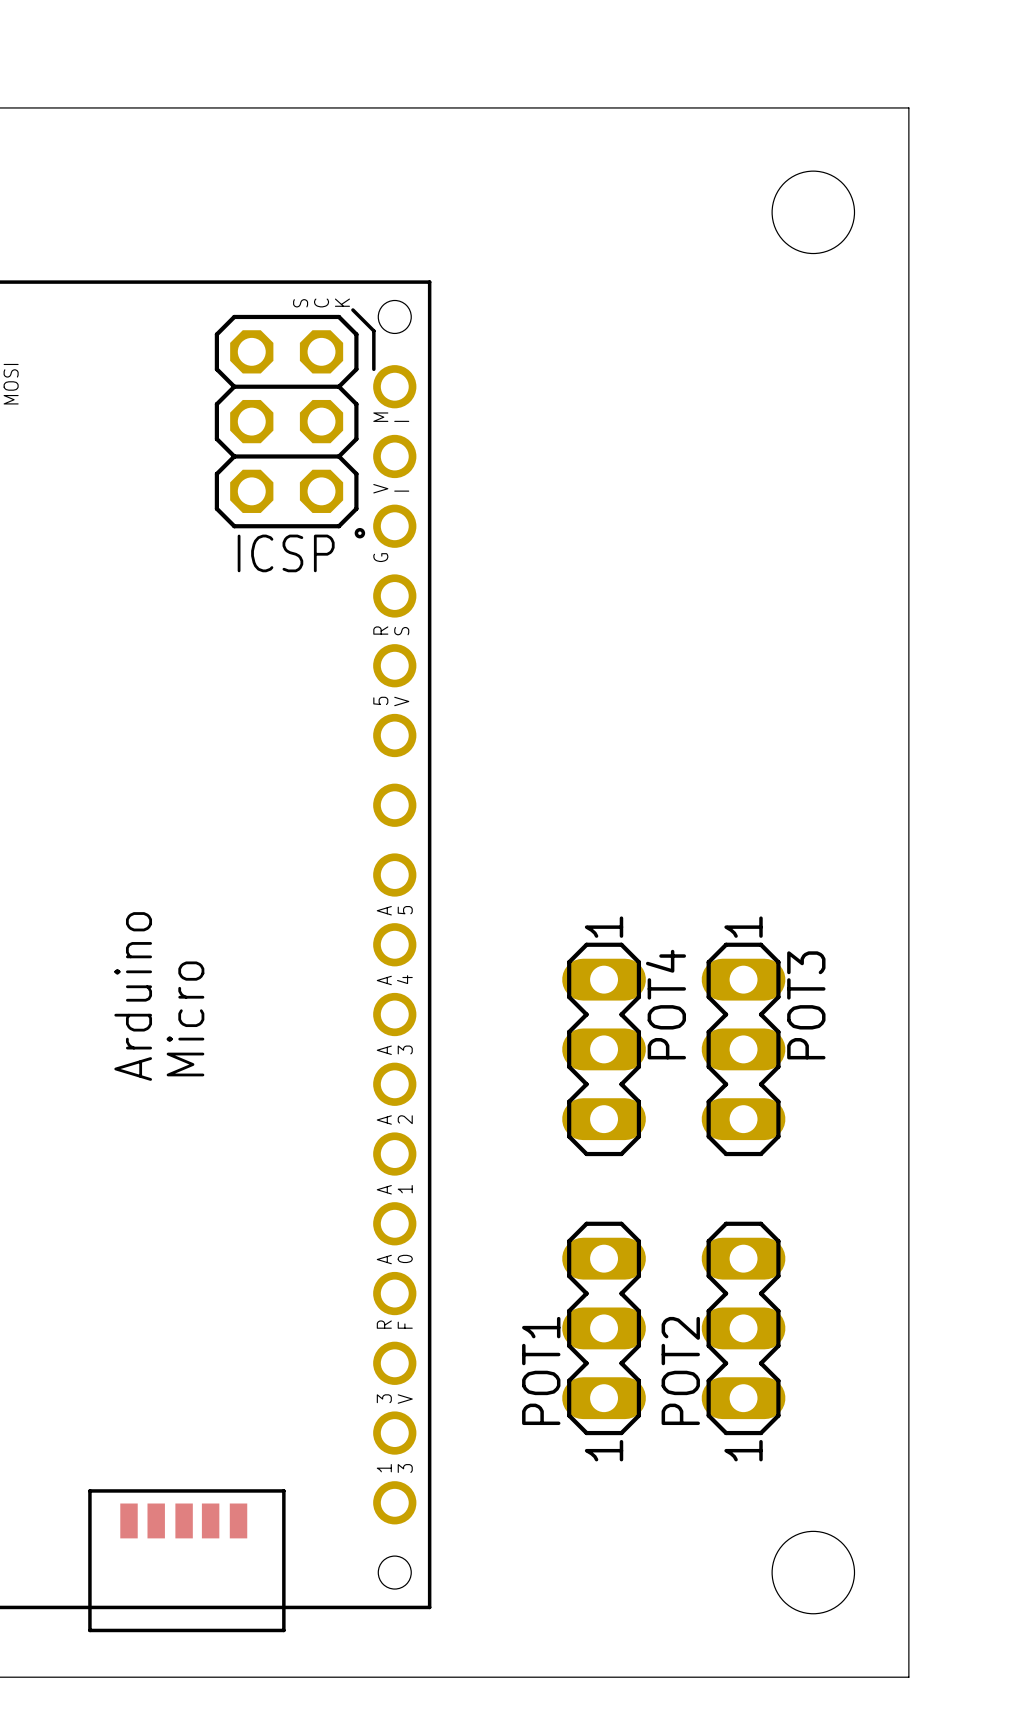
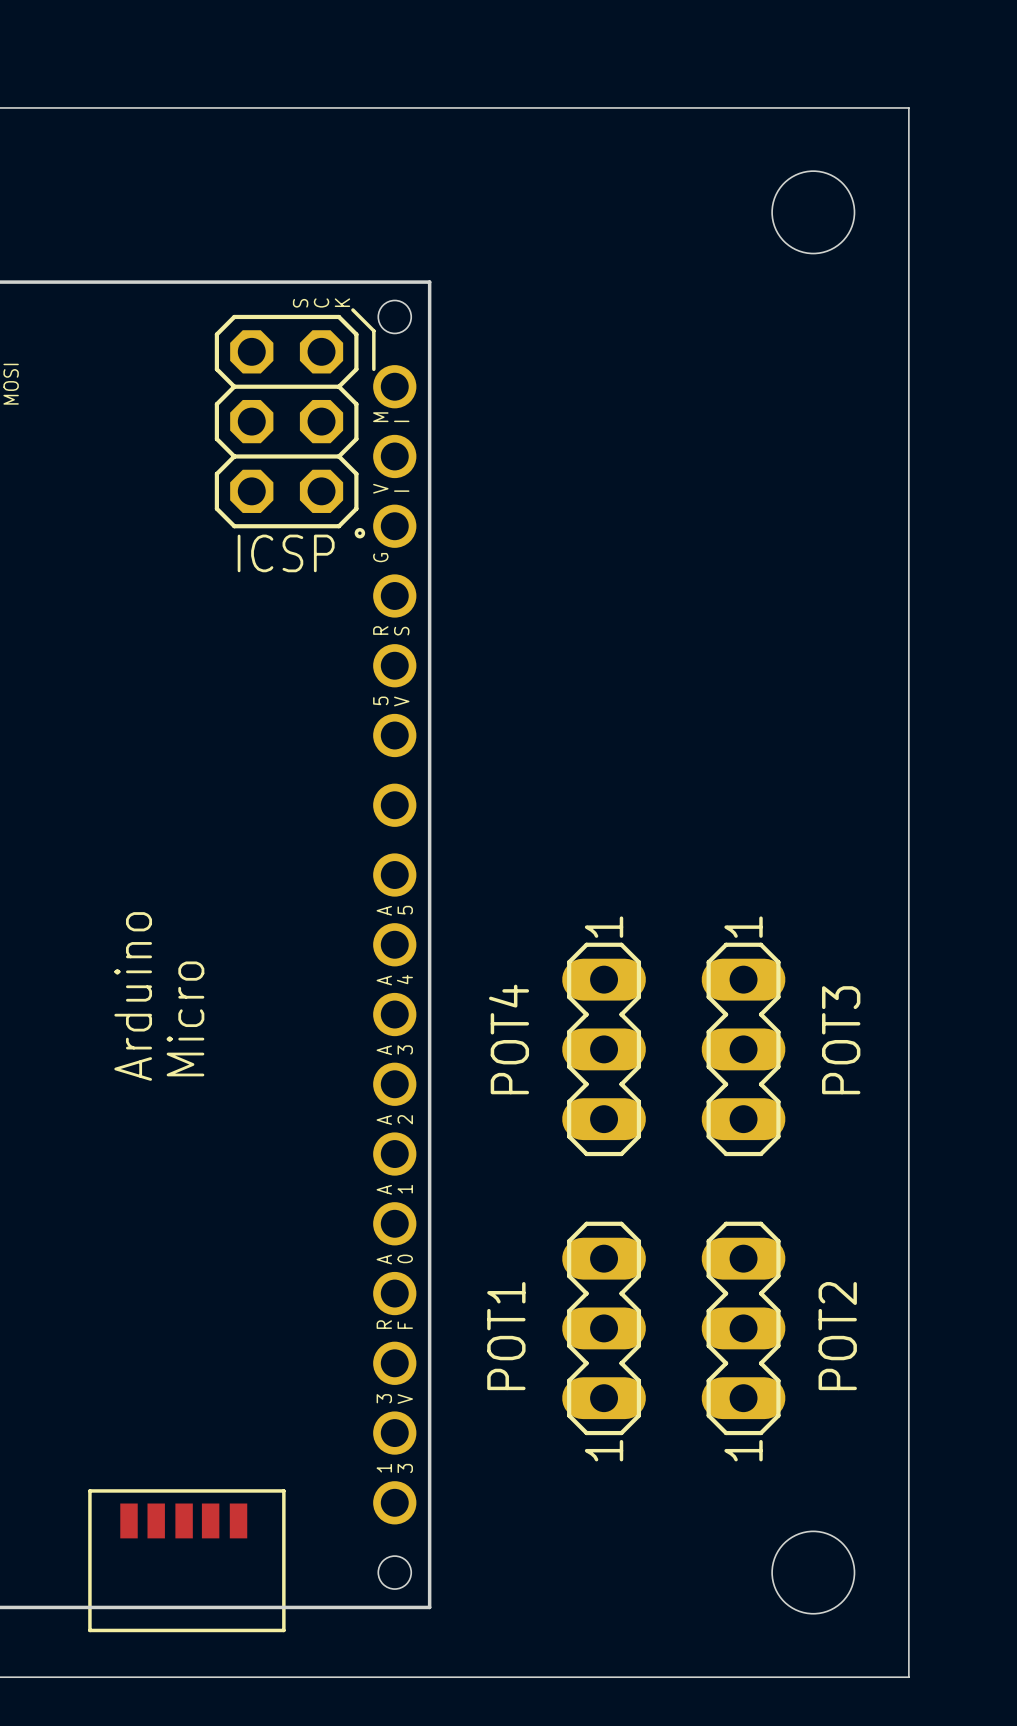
POT4 name position: POT4 (665, 1004) -> POT4 (509, 1039)
POT3 name position: POT3 (806, 1005) -> POT3 (841, 1040)
POT1 name position: POT1 (541, 1370) -> POT1 (506, 1336)
POT2 name position: POT2 (680, 1370) -> POT2 (837, 1336)

